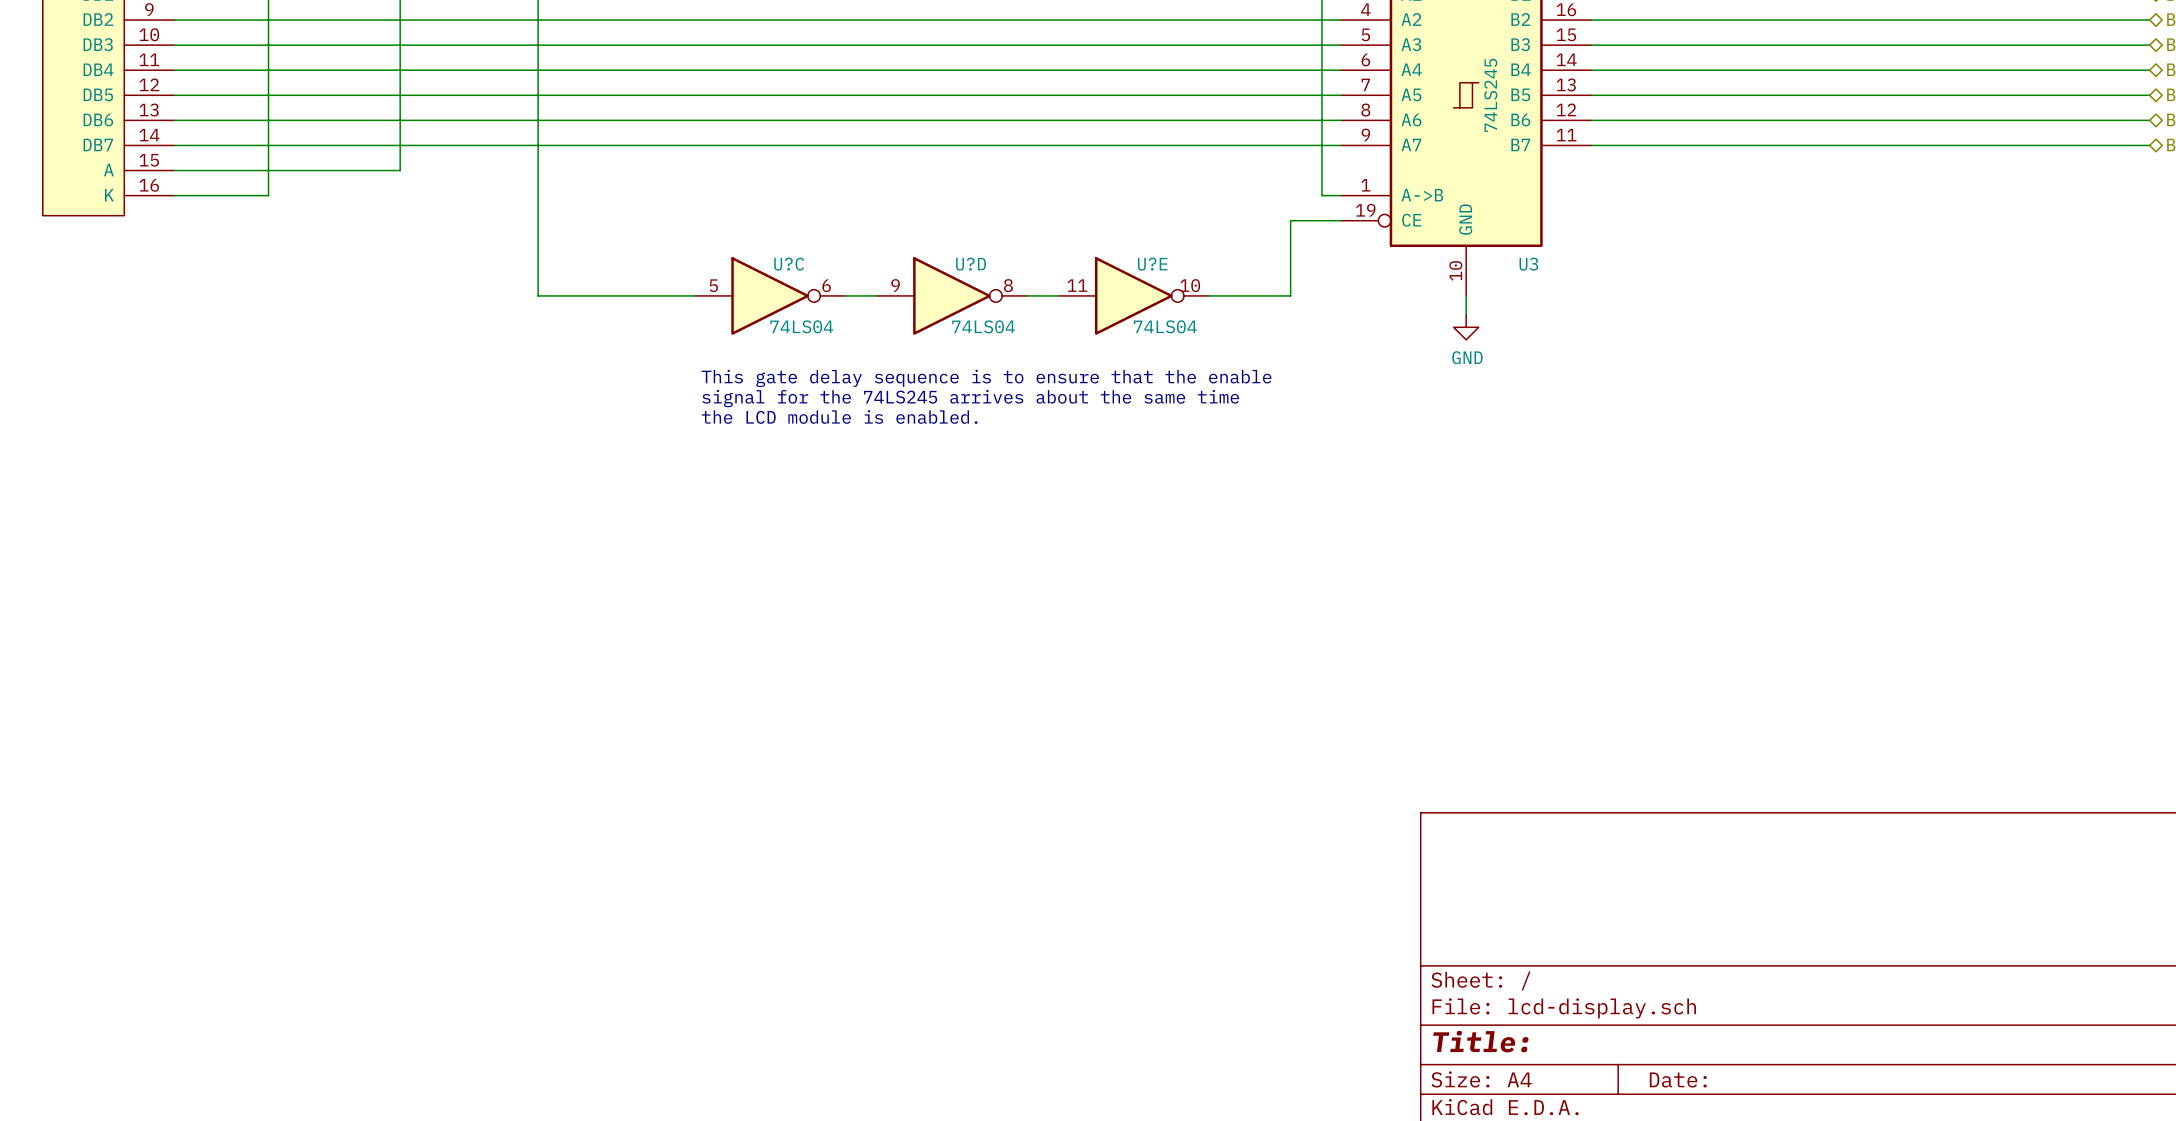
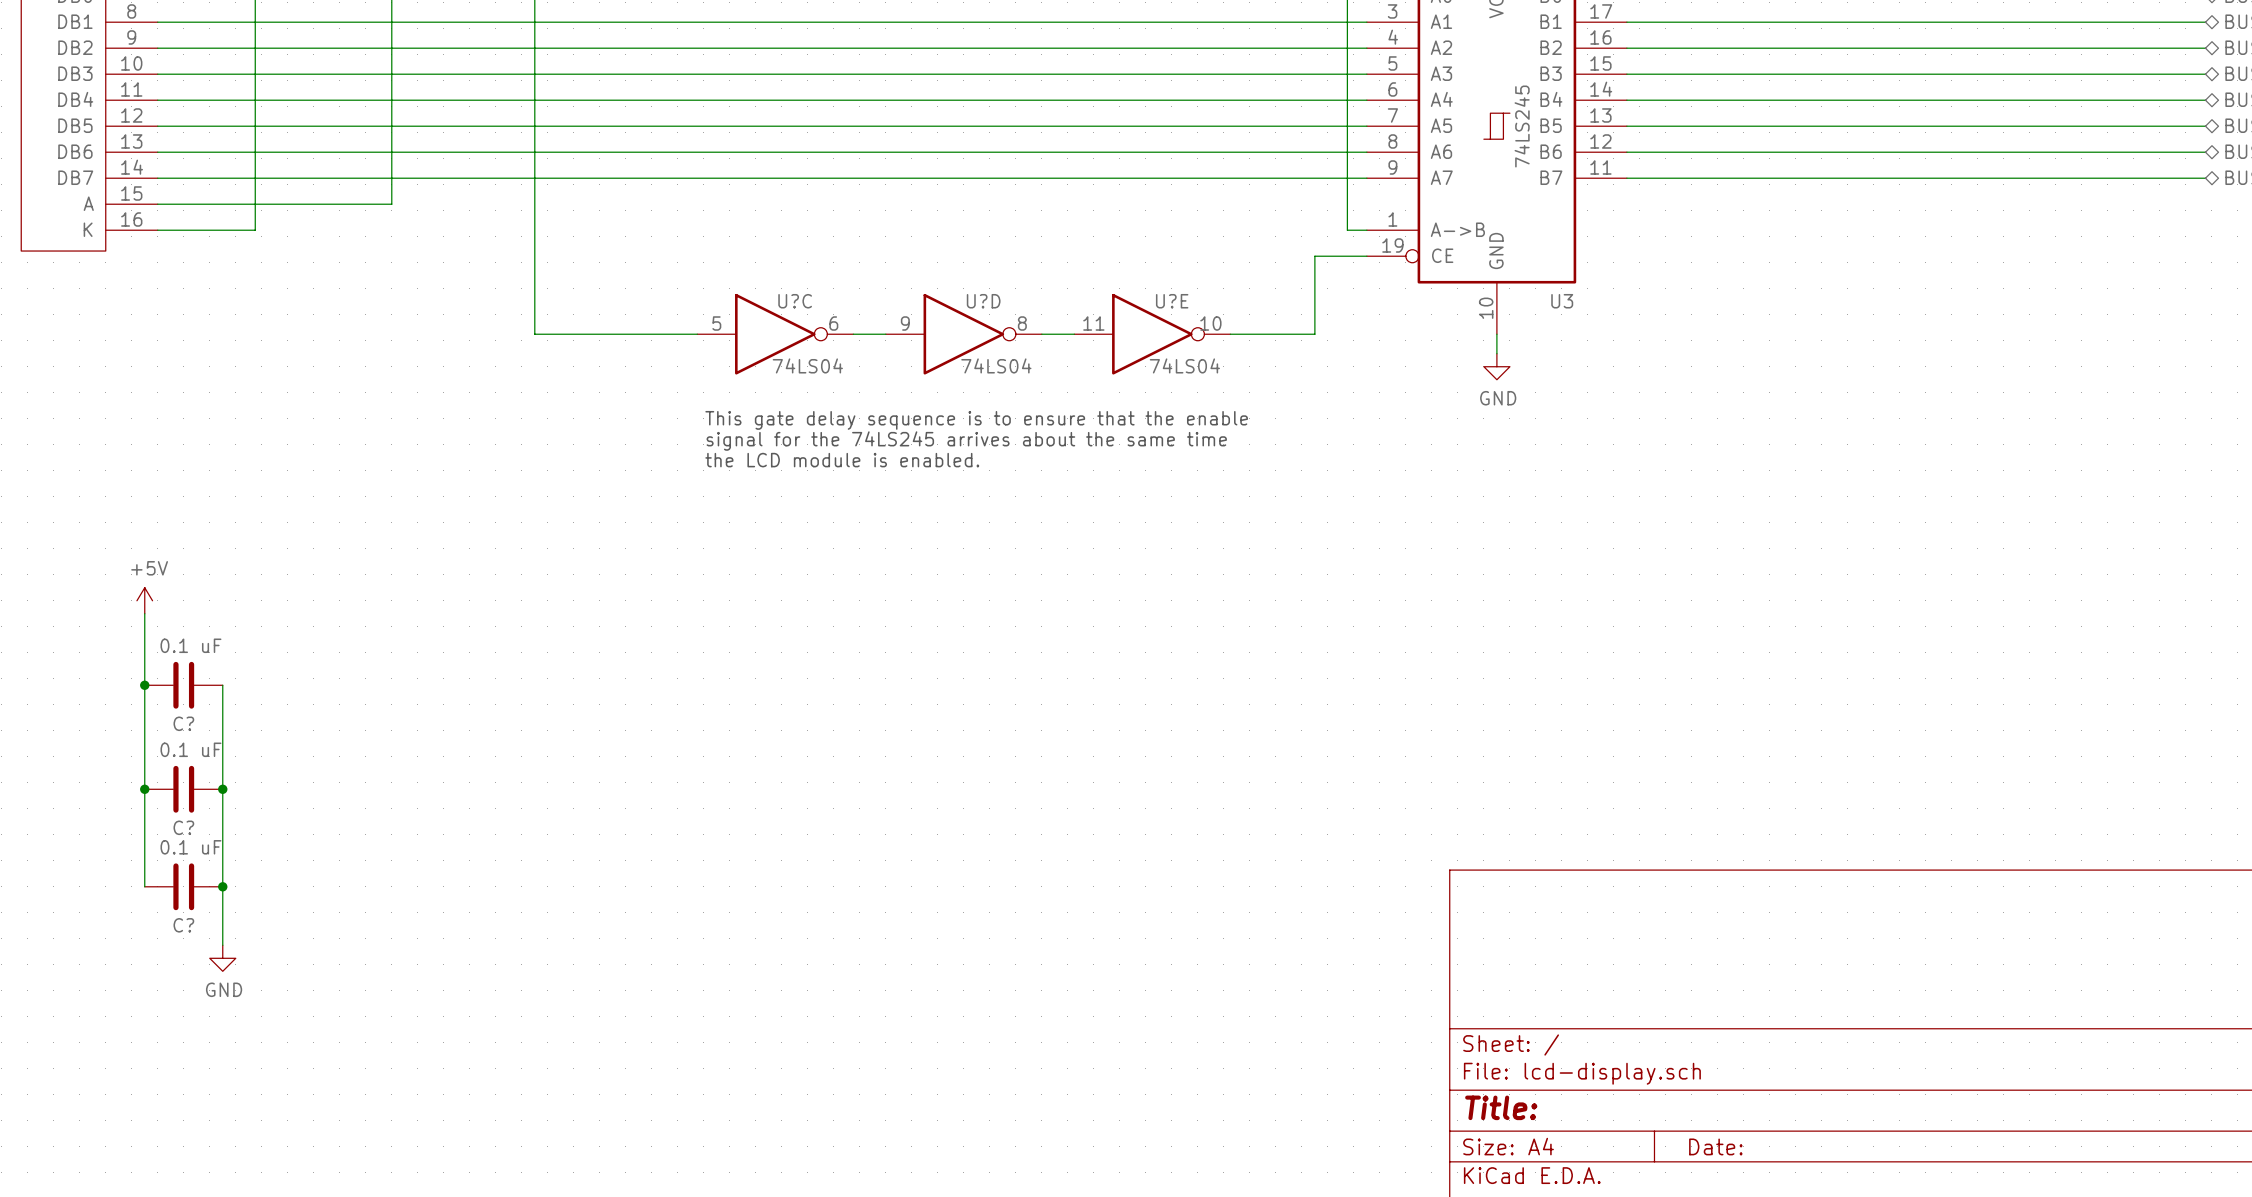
power symbol: none -> +5V (144, 600)
wire: none -> (144, 613) (144, 886)
junction: none -> (144, 685)
C?: none -> 0.1 uF (183, 685)
wire: none -> (222, 685) (222, 945)
junction: none -> (144, 789)
C?: none -> 0.1 uF (183, 789)
junction: none -> (222, 789)
C?: none -> 0.1 uF (183, 886)
junction: none -> (222, 886)
power symbol: none -> GND (222, 958)

